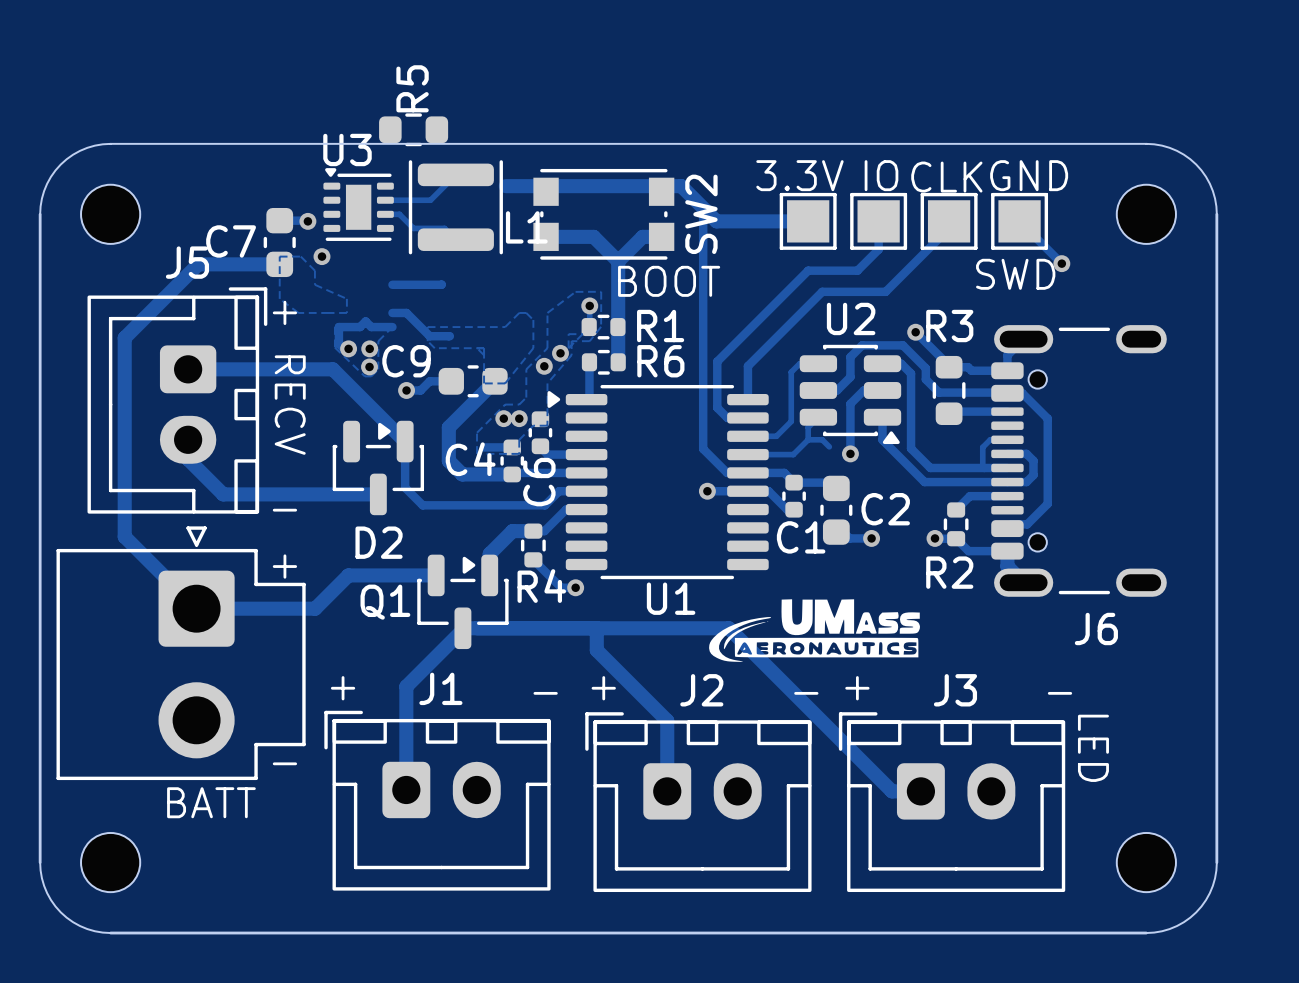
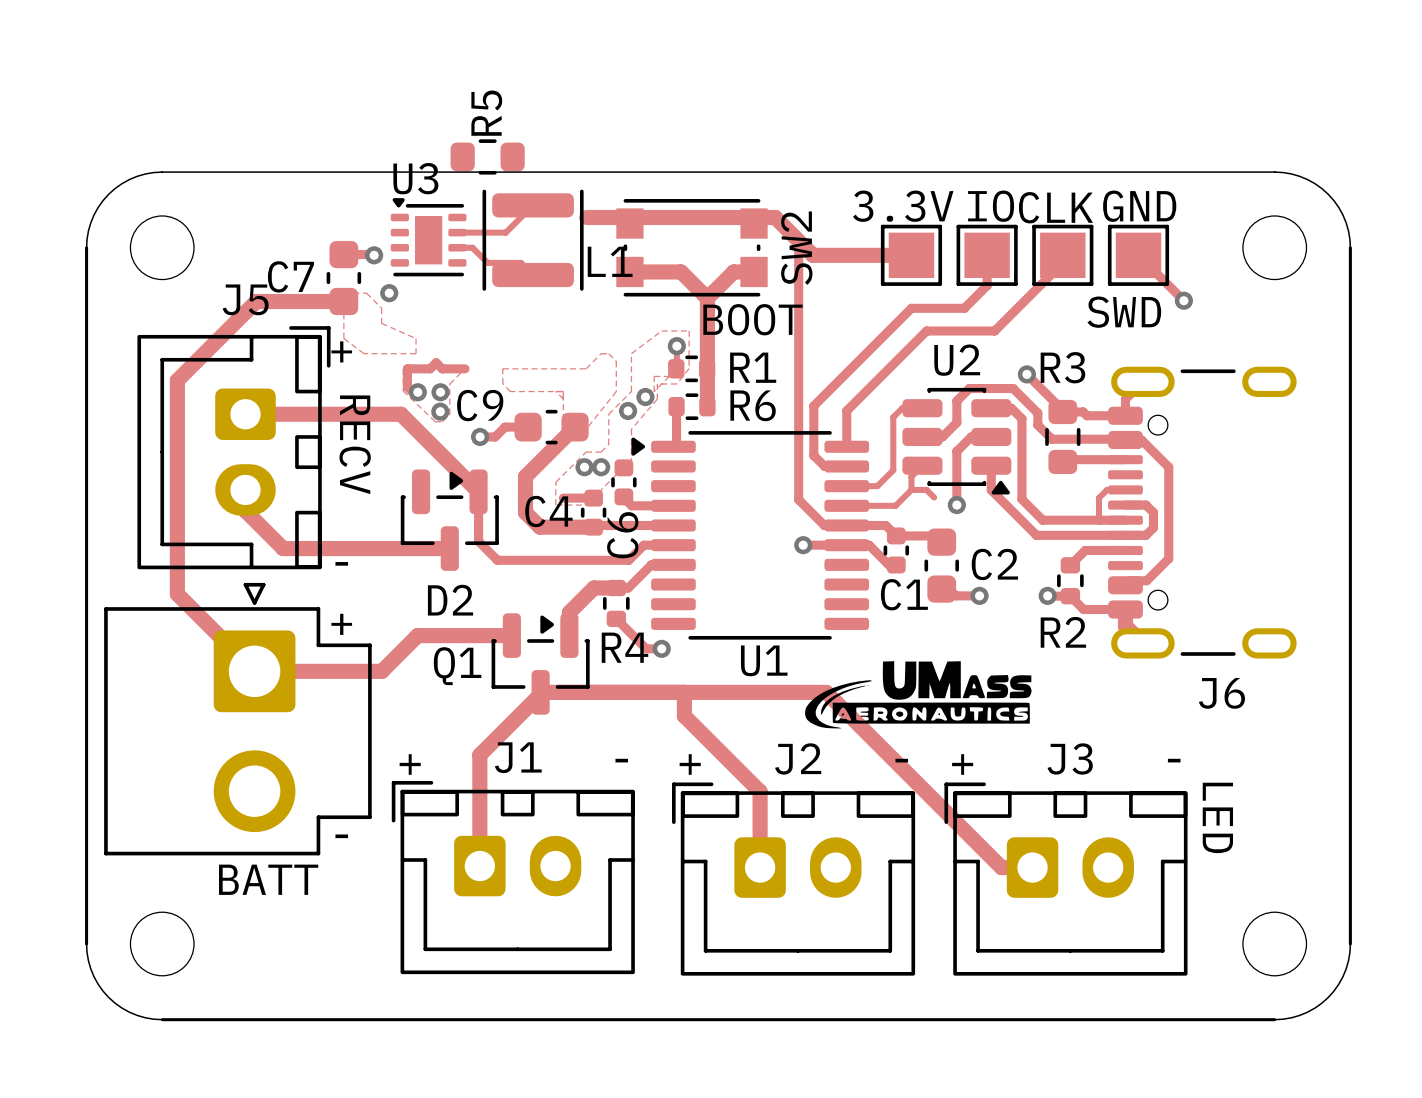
track: (392, 284) (441, 284) -> none
track: (392, 312) (406, 312) (429, 336) (449, 336) -> none

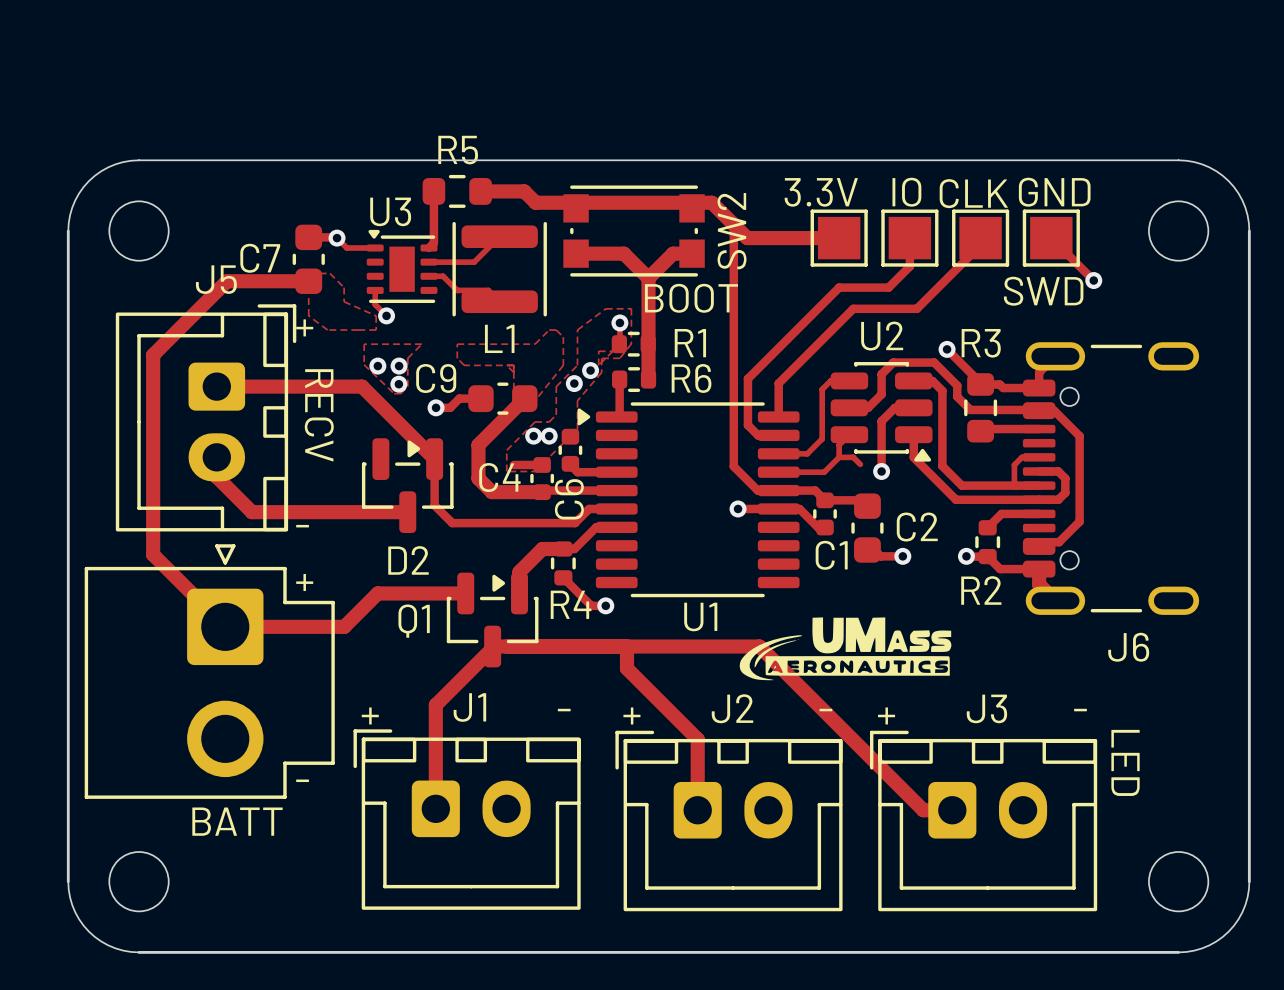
R5 name rotation: 0° (486, 113) -> 90° clockwise (458, 150)
R5 position: (487, 156) -> (457, 191)
track: none -> (433, 191) (433, 243) (428, 248)
track: none -> (480, 191) (524, 191) (535, 202)
track: (533, 205) (505, 232) (457, 232) -> (499, 236) (474, 262) (428, 262)
U3 position: (428, 237) -> (402, 266)
L1 position: (533, 240) -> (499, 269)
track: (457, 247) (472, 247) (487, 262) (520, 262) (533, 275) -> (428, 276) (443, 276) (457, 290) (488, 290) (499, 301)
track: none -> (337, 238) (346, 248) (375, 248)
L1 name position: L1 (610, 261) -> L1 (499, 338)
via position: (389, 293) -> (386, 315)
track: none -> (375, 290) (375, 304) (386, 315)
track: (464, 368) (442, 368) (436, 362) (430, 368) (407, 368) (407, 387) (411, 391) -> none

